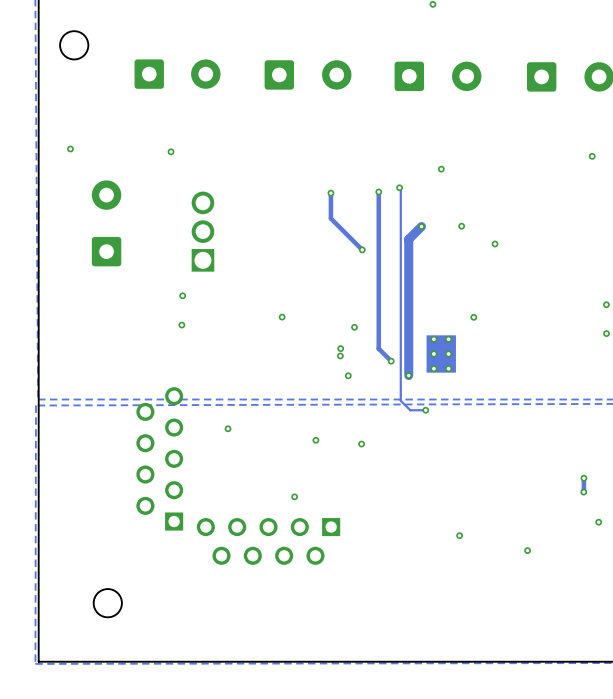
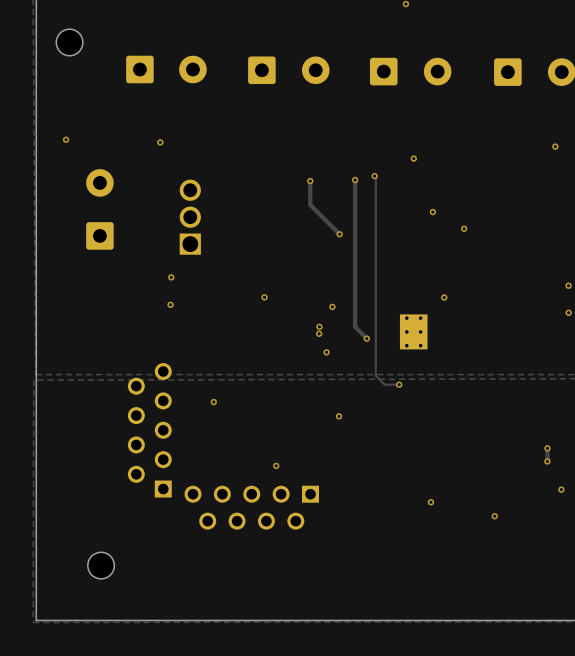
track: (421, 226) (408, 239) (408, 375) -> none
via: (421, 226) -> none
via: (408, 375) -> none
via: (315, 440) -> none

